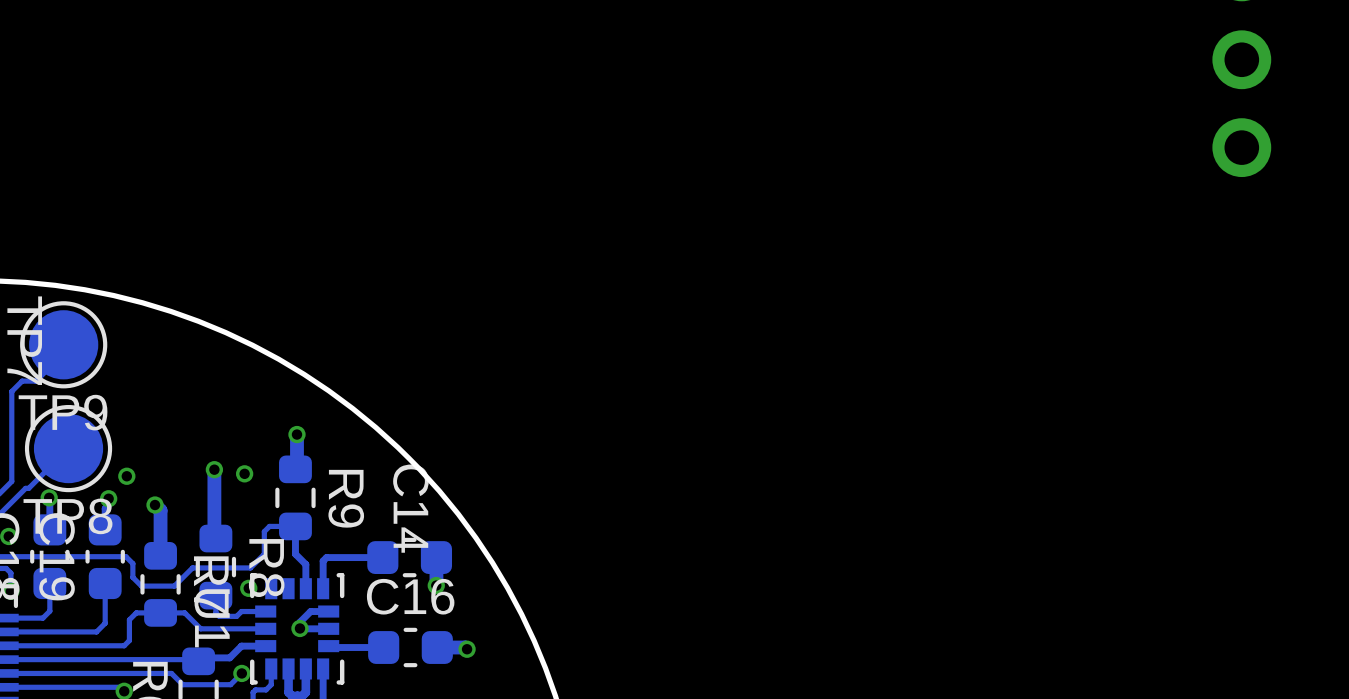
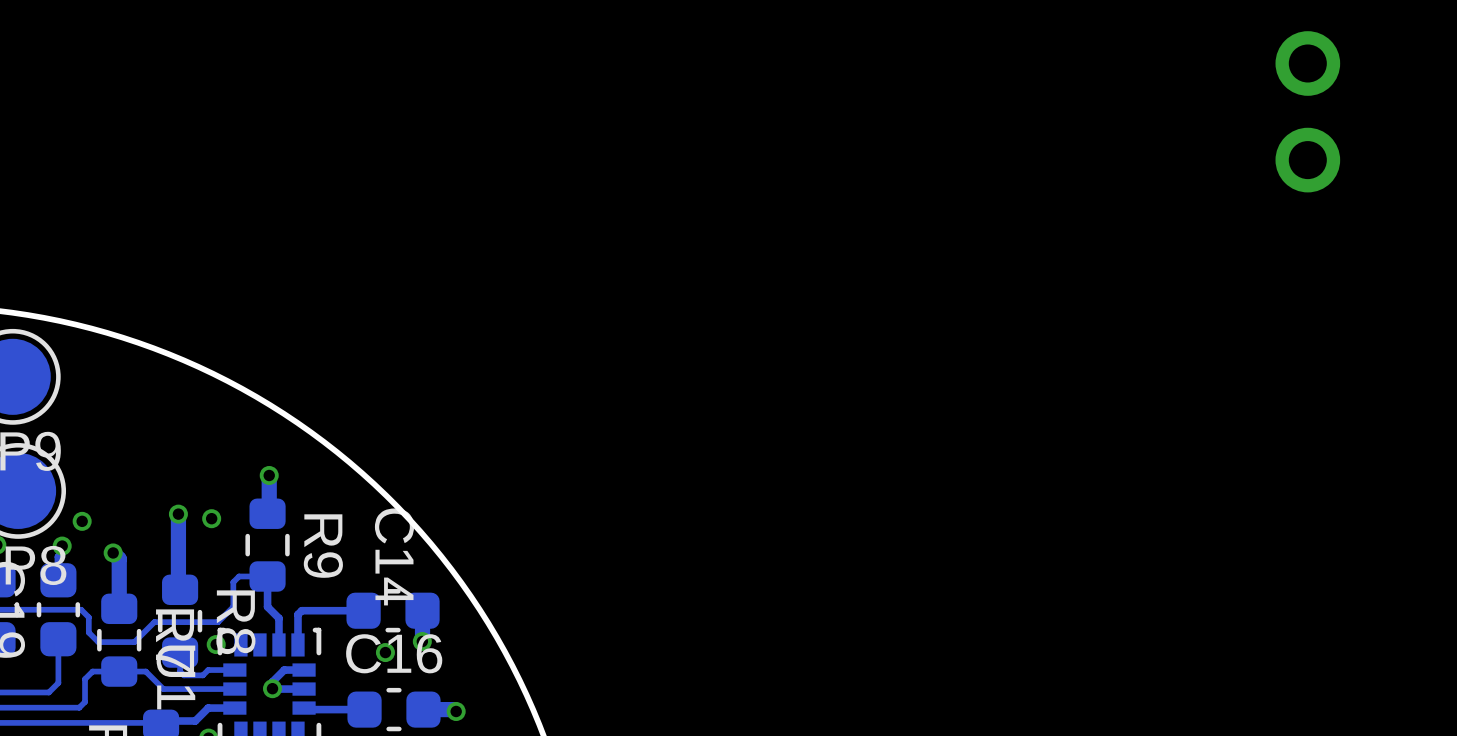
via: none -> (385, 652)

